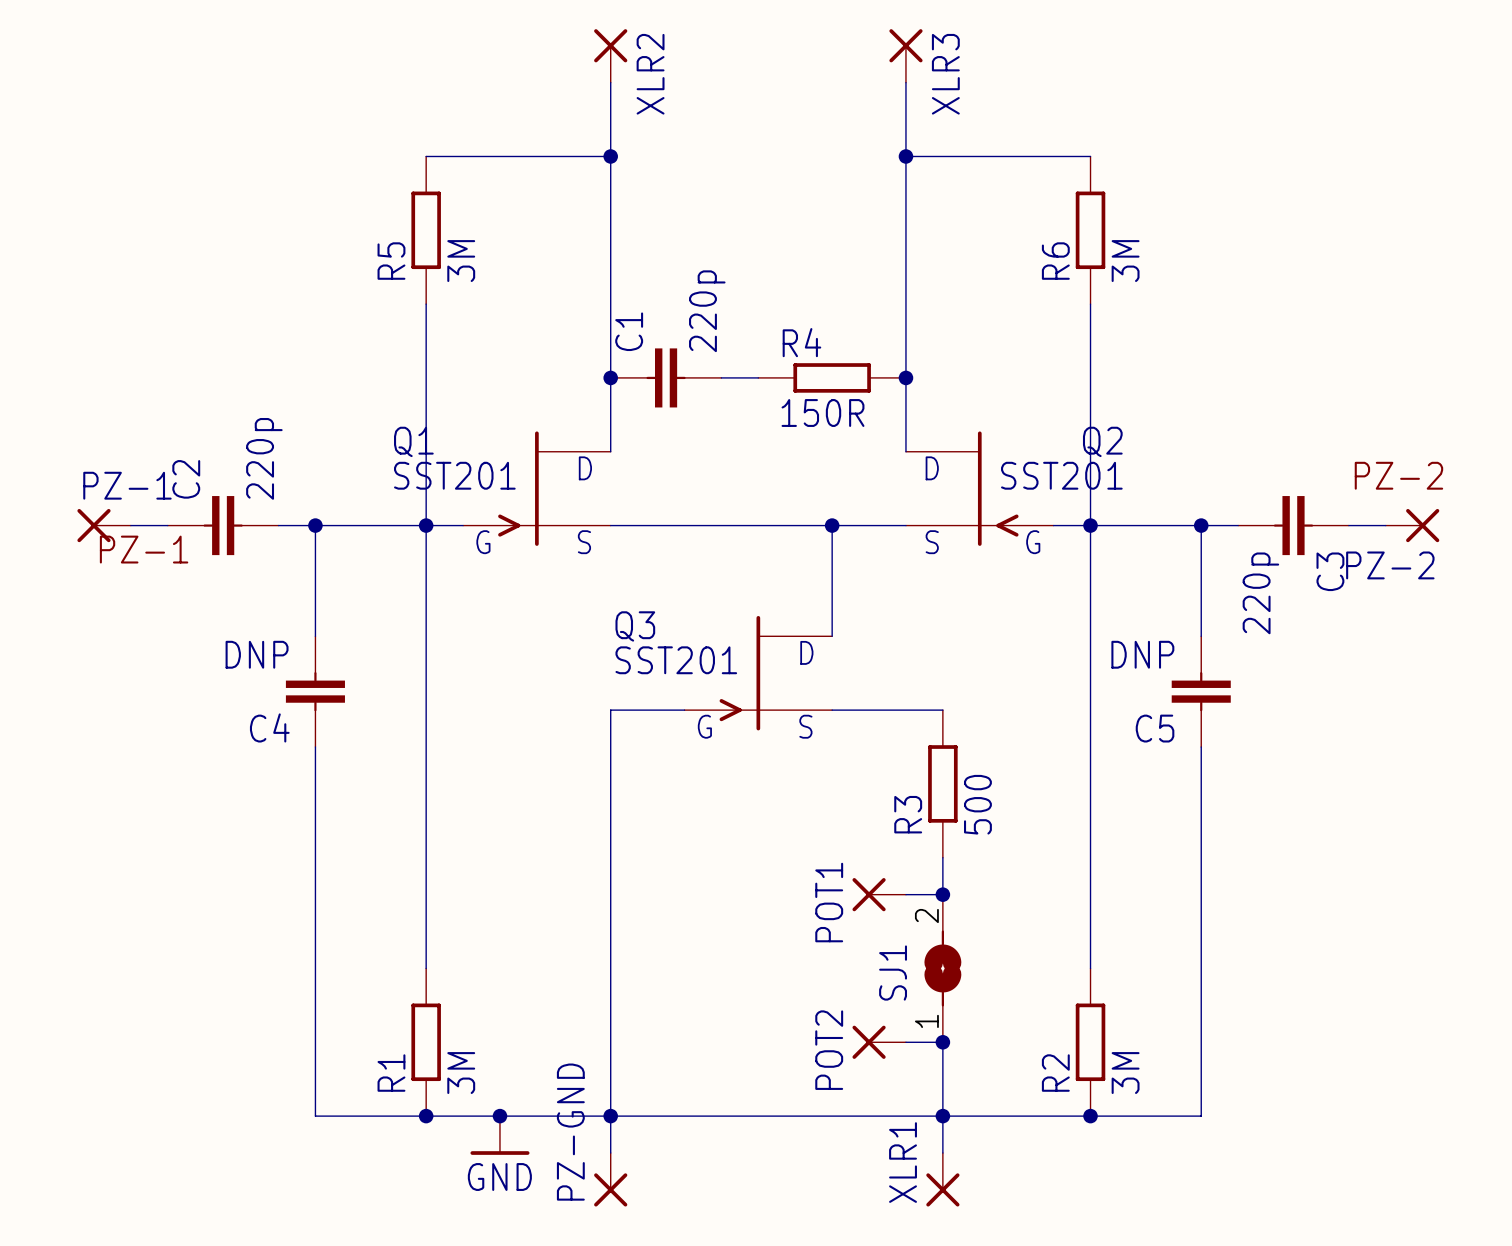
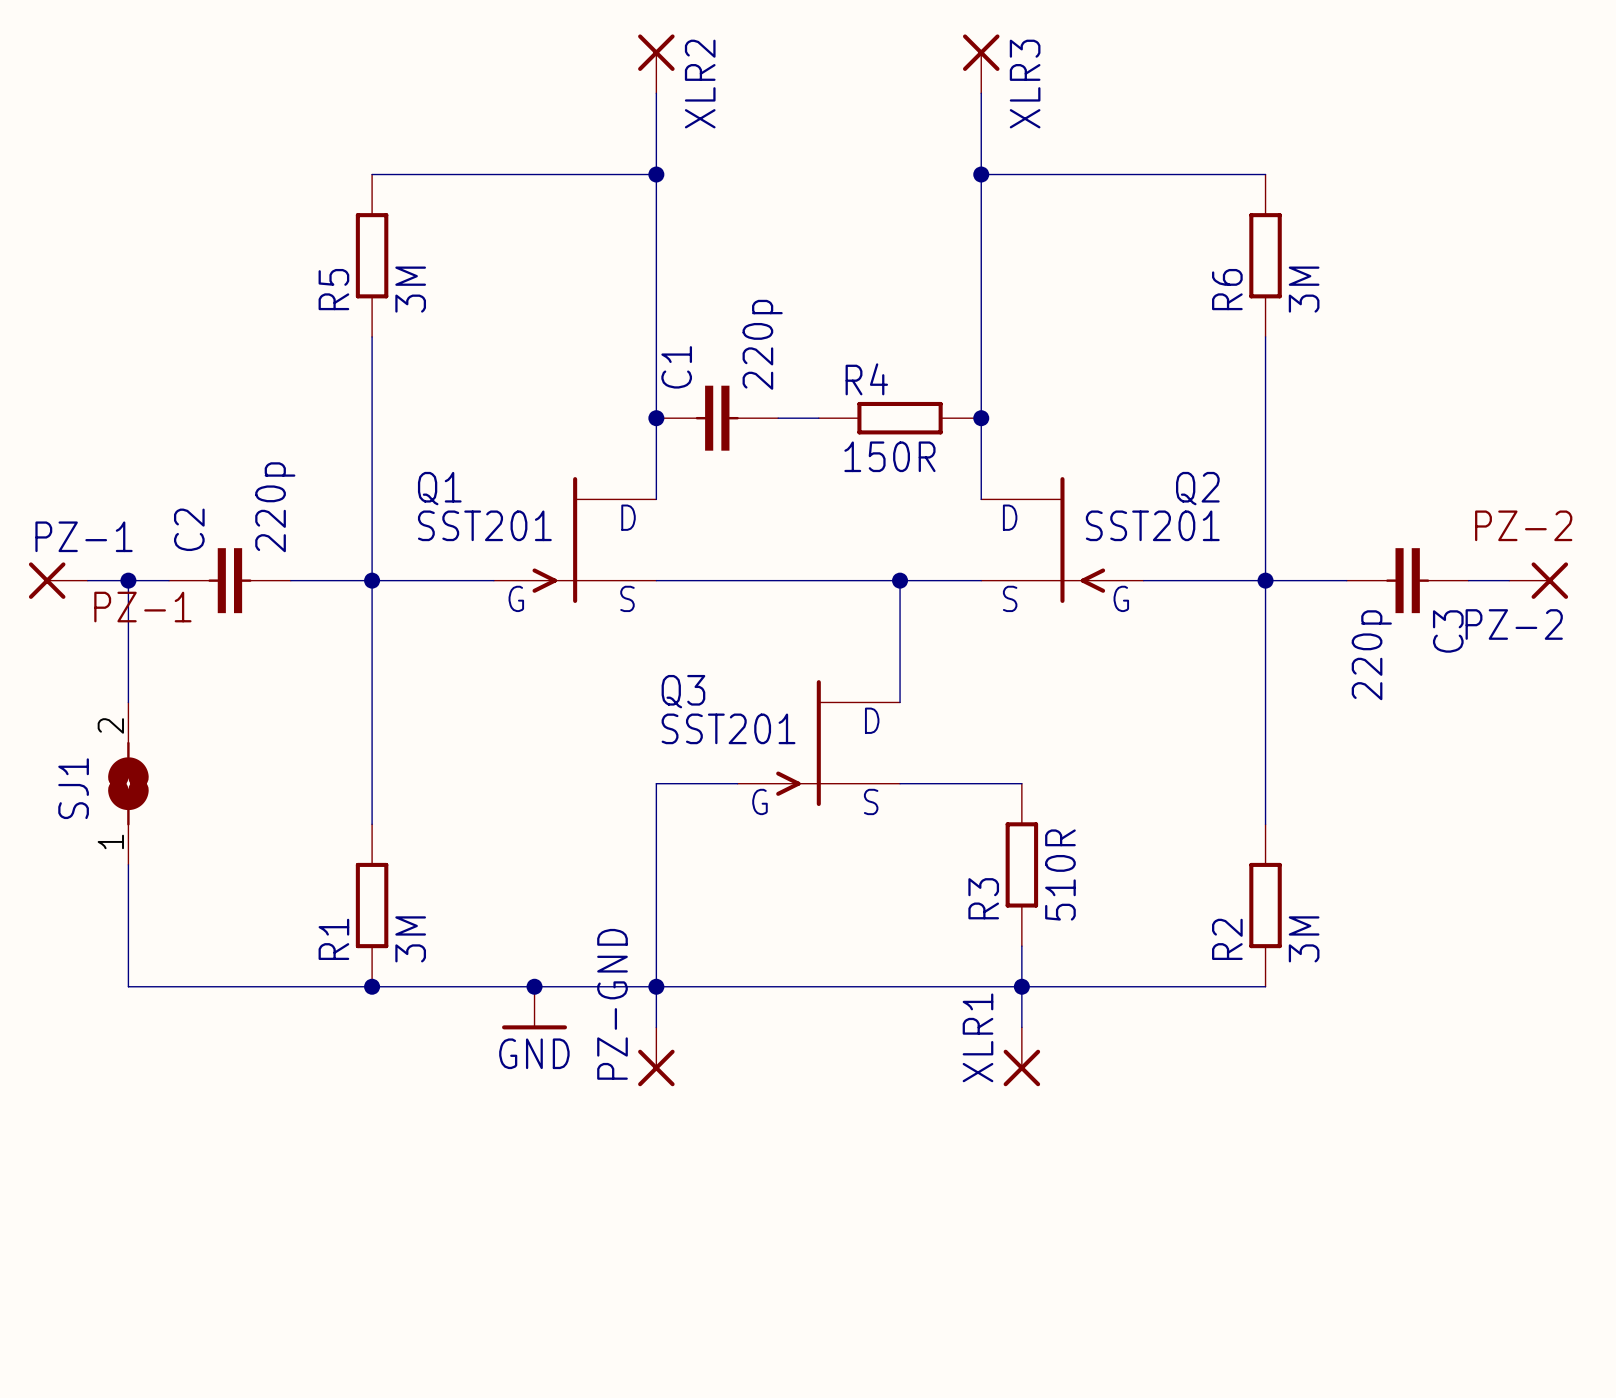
wire: none -> (372, 174) (453, 174)
wire: none -> (1184, 174) (1265, 174)
R5 position: (426, 230) -> (372, 255)
R6 position: (1090, 230) -> (1265, 255)
wire: none -> (372, 336) (372, 824)
wire: (426, 304) (426, 968) -> none
wire: (1090, 304) (1090, 968) -> none
wire: none -> (1265, 336) (1265, 824)
wire: none -> (87, 580) (128, 580) (128, 702)
PZ-1 position: (104, 525) -> (58, 580)
junction: none -> (128, 580)
wire: (315, 525) (315, 636) -> none
junction: (315, 525) -> none
junction: none -> (372, 580)
junction: (426, 525) -> none
junction: (1090, 525) -> none
junction: none -> (1265, 580)
wire: (1201, 525) (1201, 636) -> none
junction: (1201, 525) -> none
C4: DNP (315, 691) -> none
C5: DNP (1201, 691) -> none
wire: (315, 747) (315, 1116) (1201, 1116) (1201, 747) -> none
wire: none -> (128, 864) (128, 986) (981, 986)
R3 value: 500 (977, 804) -> 510R (1060, 874)
junction: none -> (372, 986)
junction: none -> (534, 986)
junction: none -> (656, 986)
POT1: (879, 894) -> none
wire: none -> (1265, 986) (1021, 986) (1021, 1027)
wire: (610, 931) (610, 1153) -> none
SJ1 position: (942, 968) -> (128, 783)
R1 position: (426, 1042) -> (372, 905)
POT2: (879, 1042) -> none
wire: (905, 1042) (942, 1042) (942, 1153) -> none
junction: (942, 1042) -> none
R2 position: (1090, 1042) -> (1265, 905)
junction: (426, 1116) -> none
junction: (499, 1116) -> none
junction: (610, 1116) -> none
junction: (942, 1116) -> none
junction: (1090, 1116) -> none
power symbol position: GND (499, 1135) -> GND (534, 1008)
PZ-GND position: (610, 1179) -> (656, 1056)
XLR1 position: (942, 1179) -> (1021, 1056)

